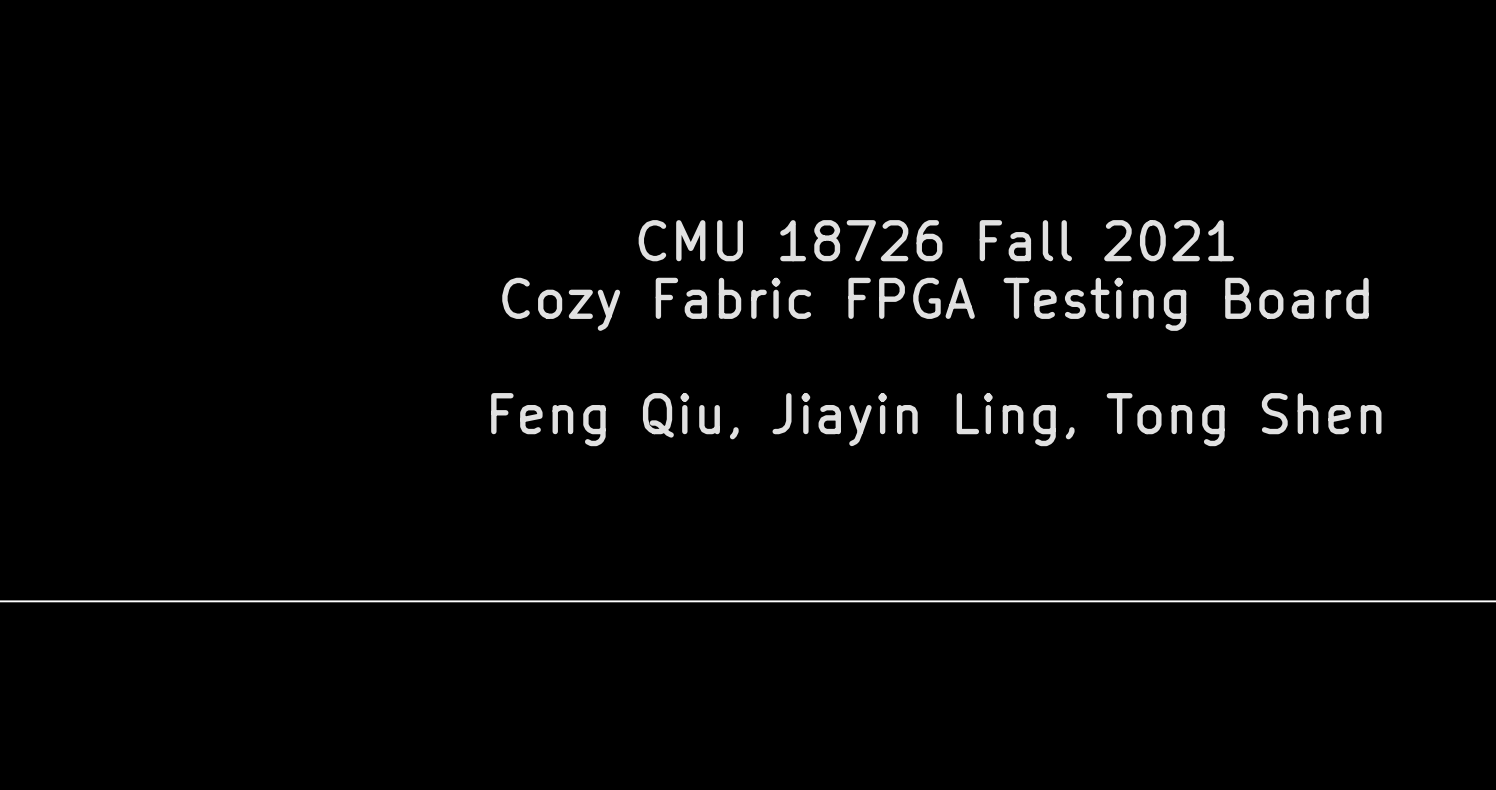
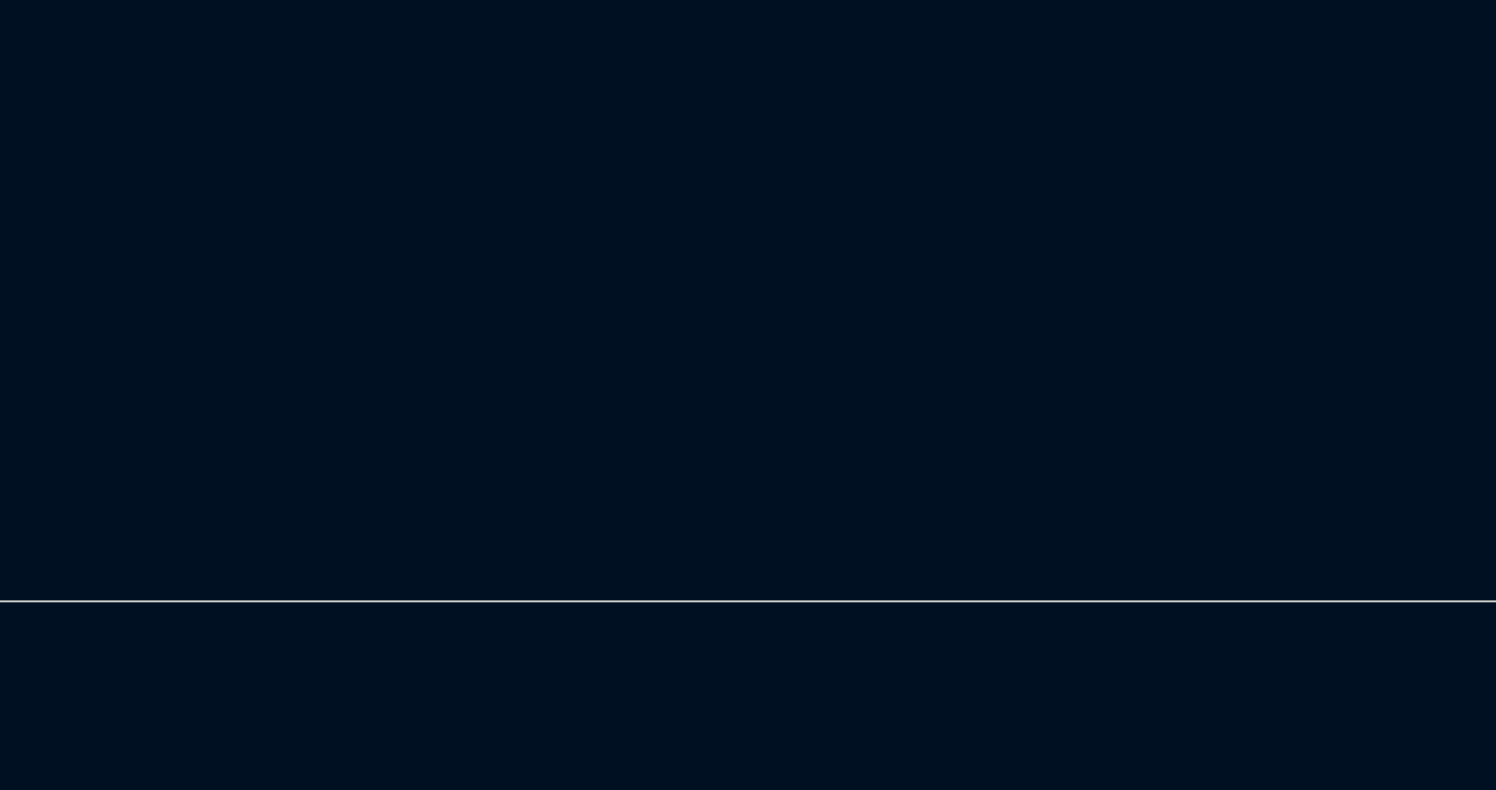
text: CMU 18726 Fall 2021 (936, 240) -> none
text: Cozy Fabric FPGA Testing Board (935, 304) -> none
text: Feng Qiu, Jiayin Ling, Tong Shen (936, 419) -> none

